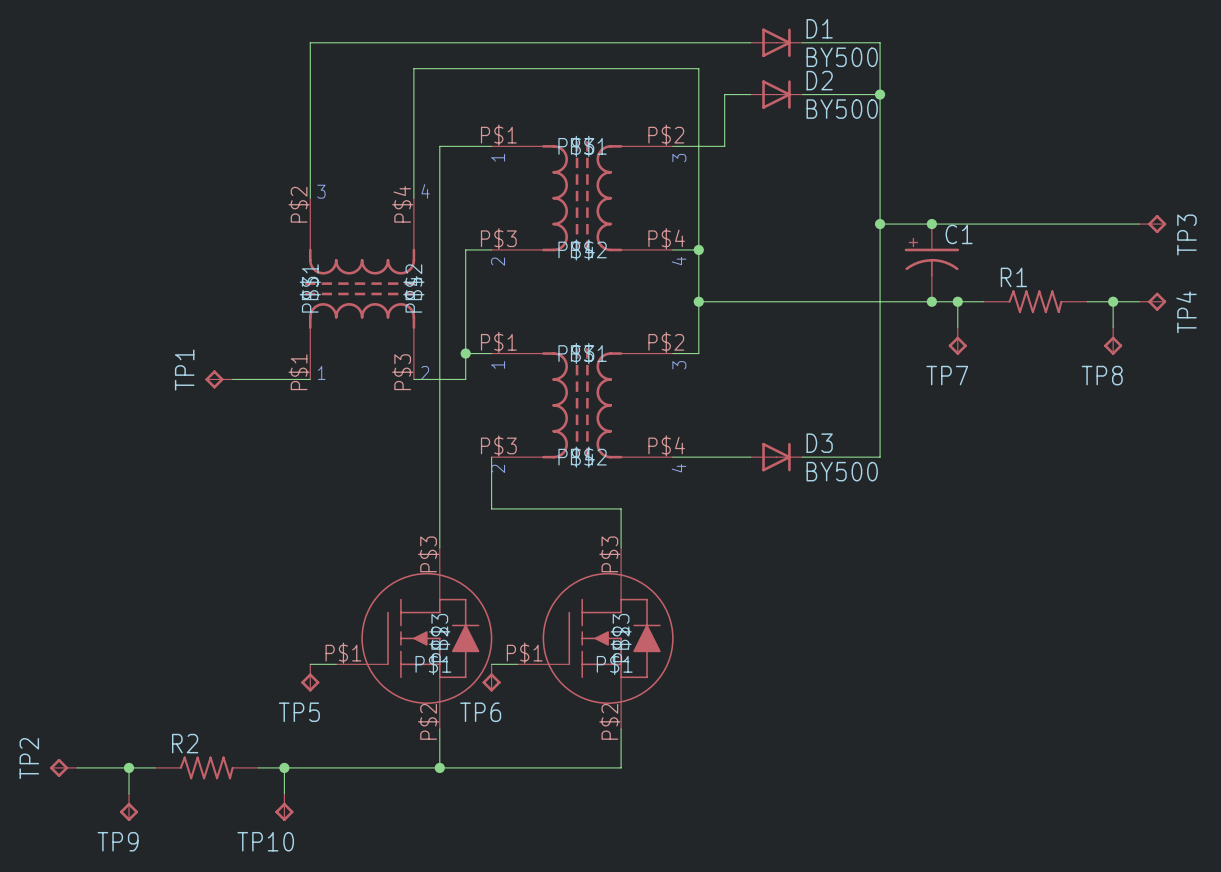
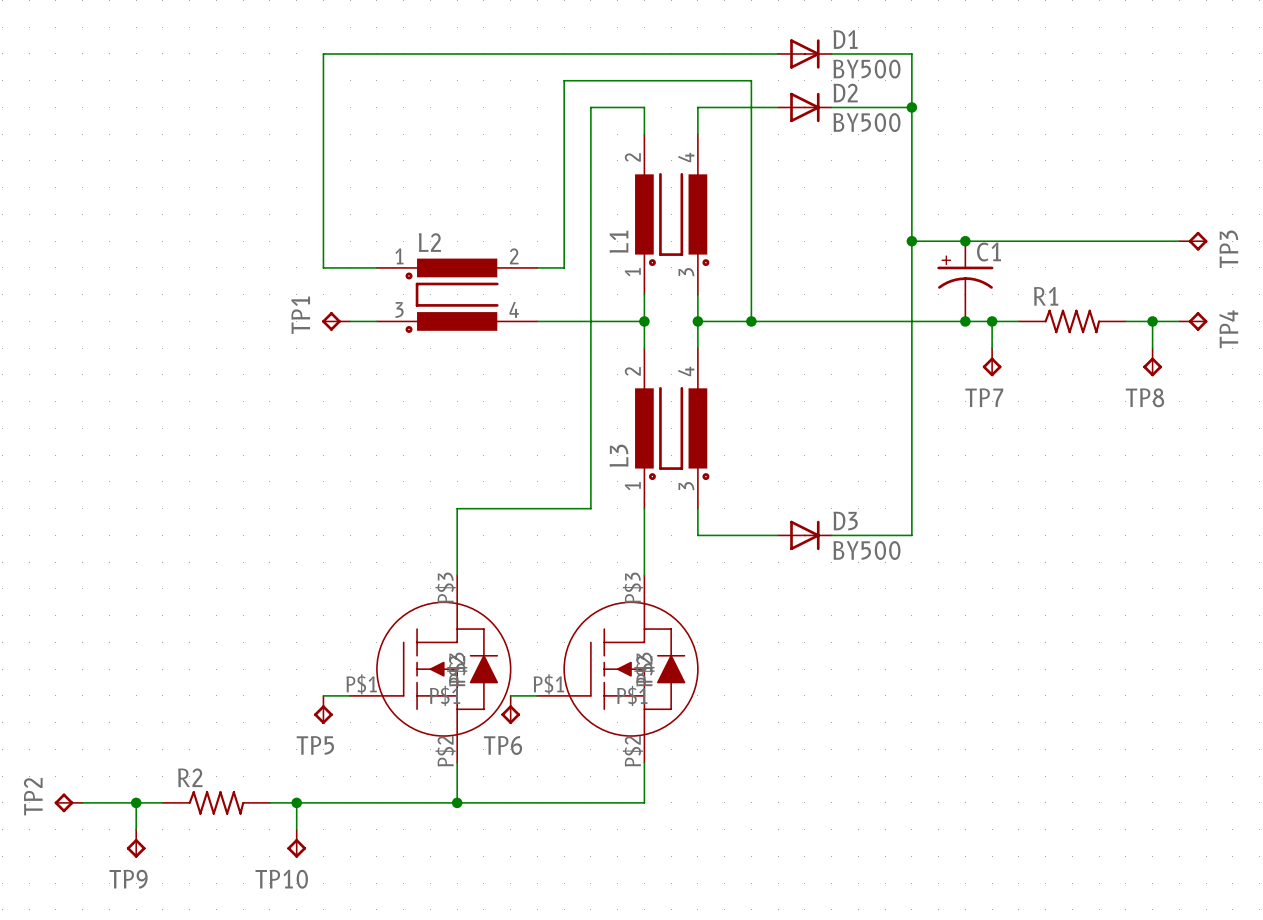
wire: (543, 68) (413, 68) (413, 198) -> (564, 80) (564, 267) (537, 267)
wire: (698, 68) (698, 353) (672, 353) -> (724, 80) (751, 80) (751, 107) (697, 107) (697, 134)
wire: (491, 146) (439, 146) (439, 483) -> (644, 134) (644, 107) (590, 107) (590, 508) (457, 508)
wire: (672, 146) (724, 146) -> (751, 321) (751, 160)
wire: none -> (323, 214) (323, 267) (376, 267)
part: (582, 198) -> none
L1: none -> (672, 214)
wire: (491, 249) (465, 249) (465, 379) (413, 379) -> none
wire: (672, 249) (698, 249) -> (697, 321) (724, 321)
junction: (698, 249) -> none
wire: none -> (644, 294) (644, 348)
wire: none -> (697, 294) (697, 348)
L2: none -> (457, 295)
part: (362, 288) -> none
wire: none -> (537, 321) (644, 321)
junction: none -> (644, 321)
junction: none -> (697, 321)
junction: (698, 301) -> none
junction: none -> (751, 321)
wire: (465, 353) (491, 353) -> (350, 321) (376, 321)
junction: (465, 353) -> none
TP1 position: (219, 379) -> (336, 321)
wire: (232, 379) (310, 379) -> none
part: (582, 405) -> none
L3: none -> (672, 428)
wire: (491, 457) (491, 508) (621, 508) -> (644, 508) (644, 535)
wire: (672, 457) (750, 457) -> none
D3 position: (776, 457) -> (804, 535)
wire: (802, 457) (880, 457) -> (831, 535) (911, 535) (911, 481)
wire: none -> (697, 508) (697, 535) (778, 535)

